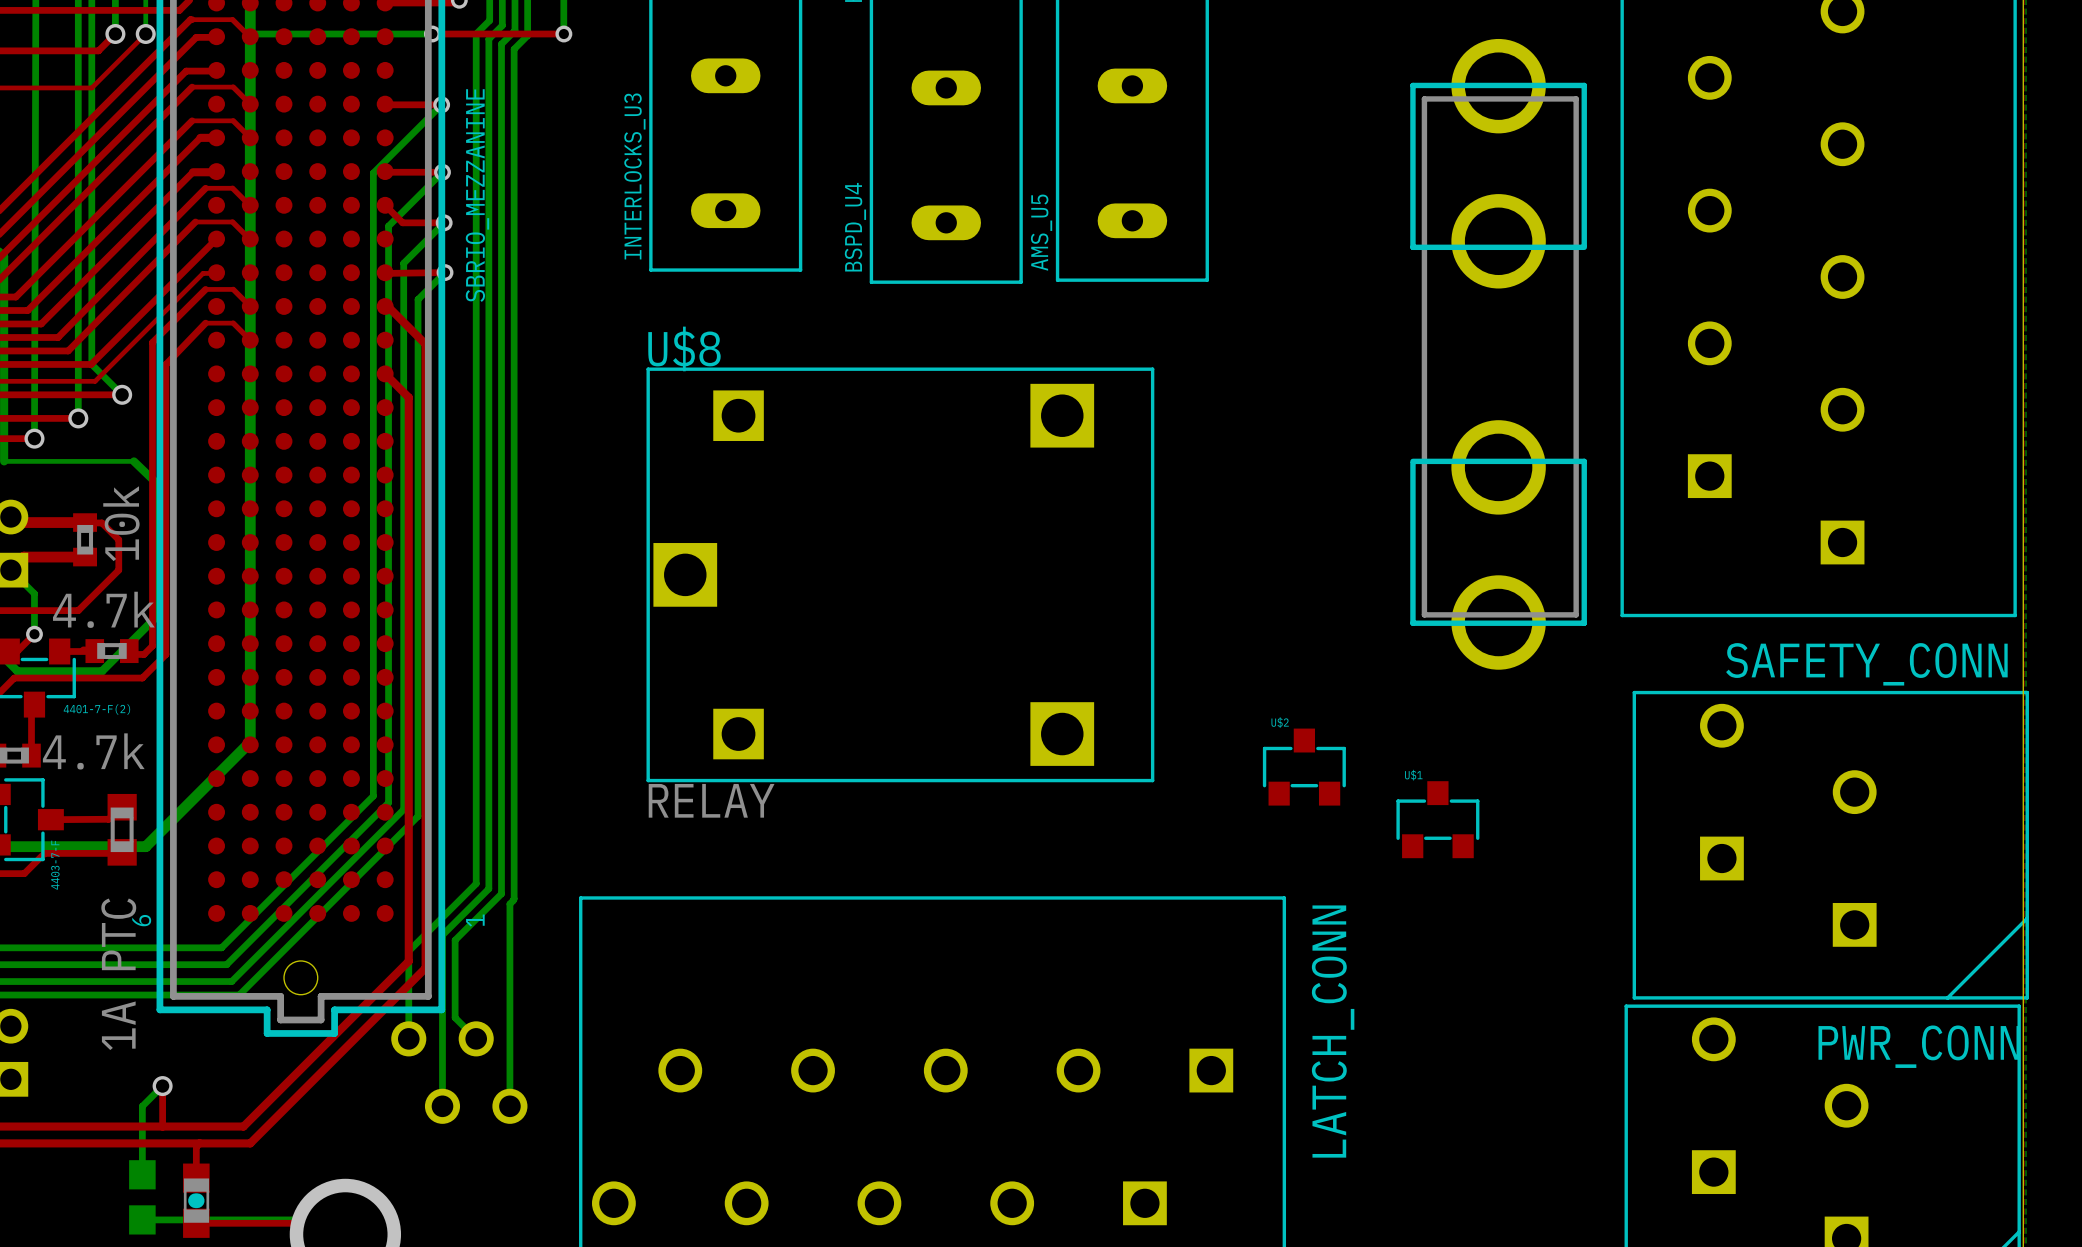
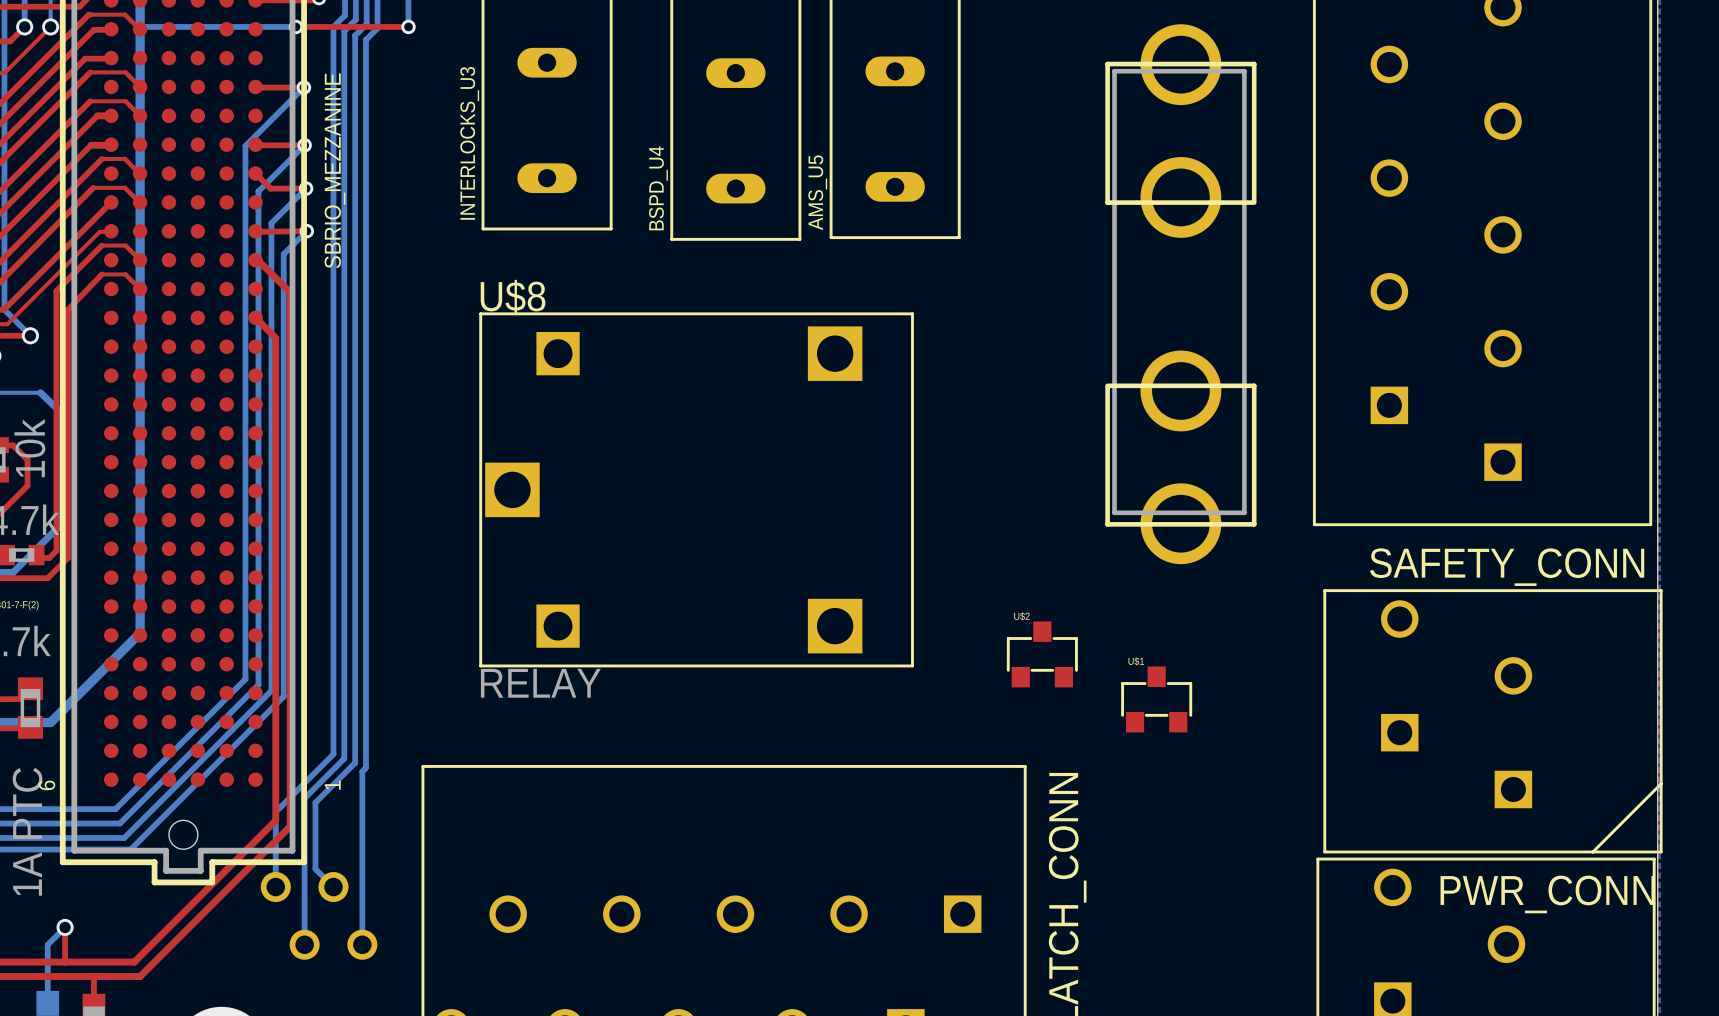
part rotation: 0° (1498, 354) -> 180° (1180, 294)

